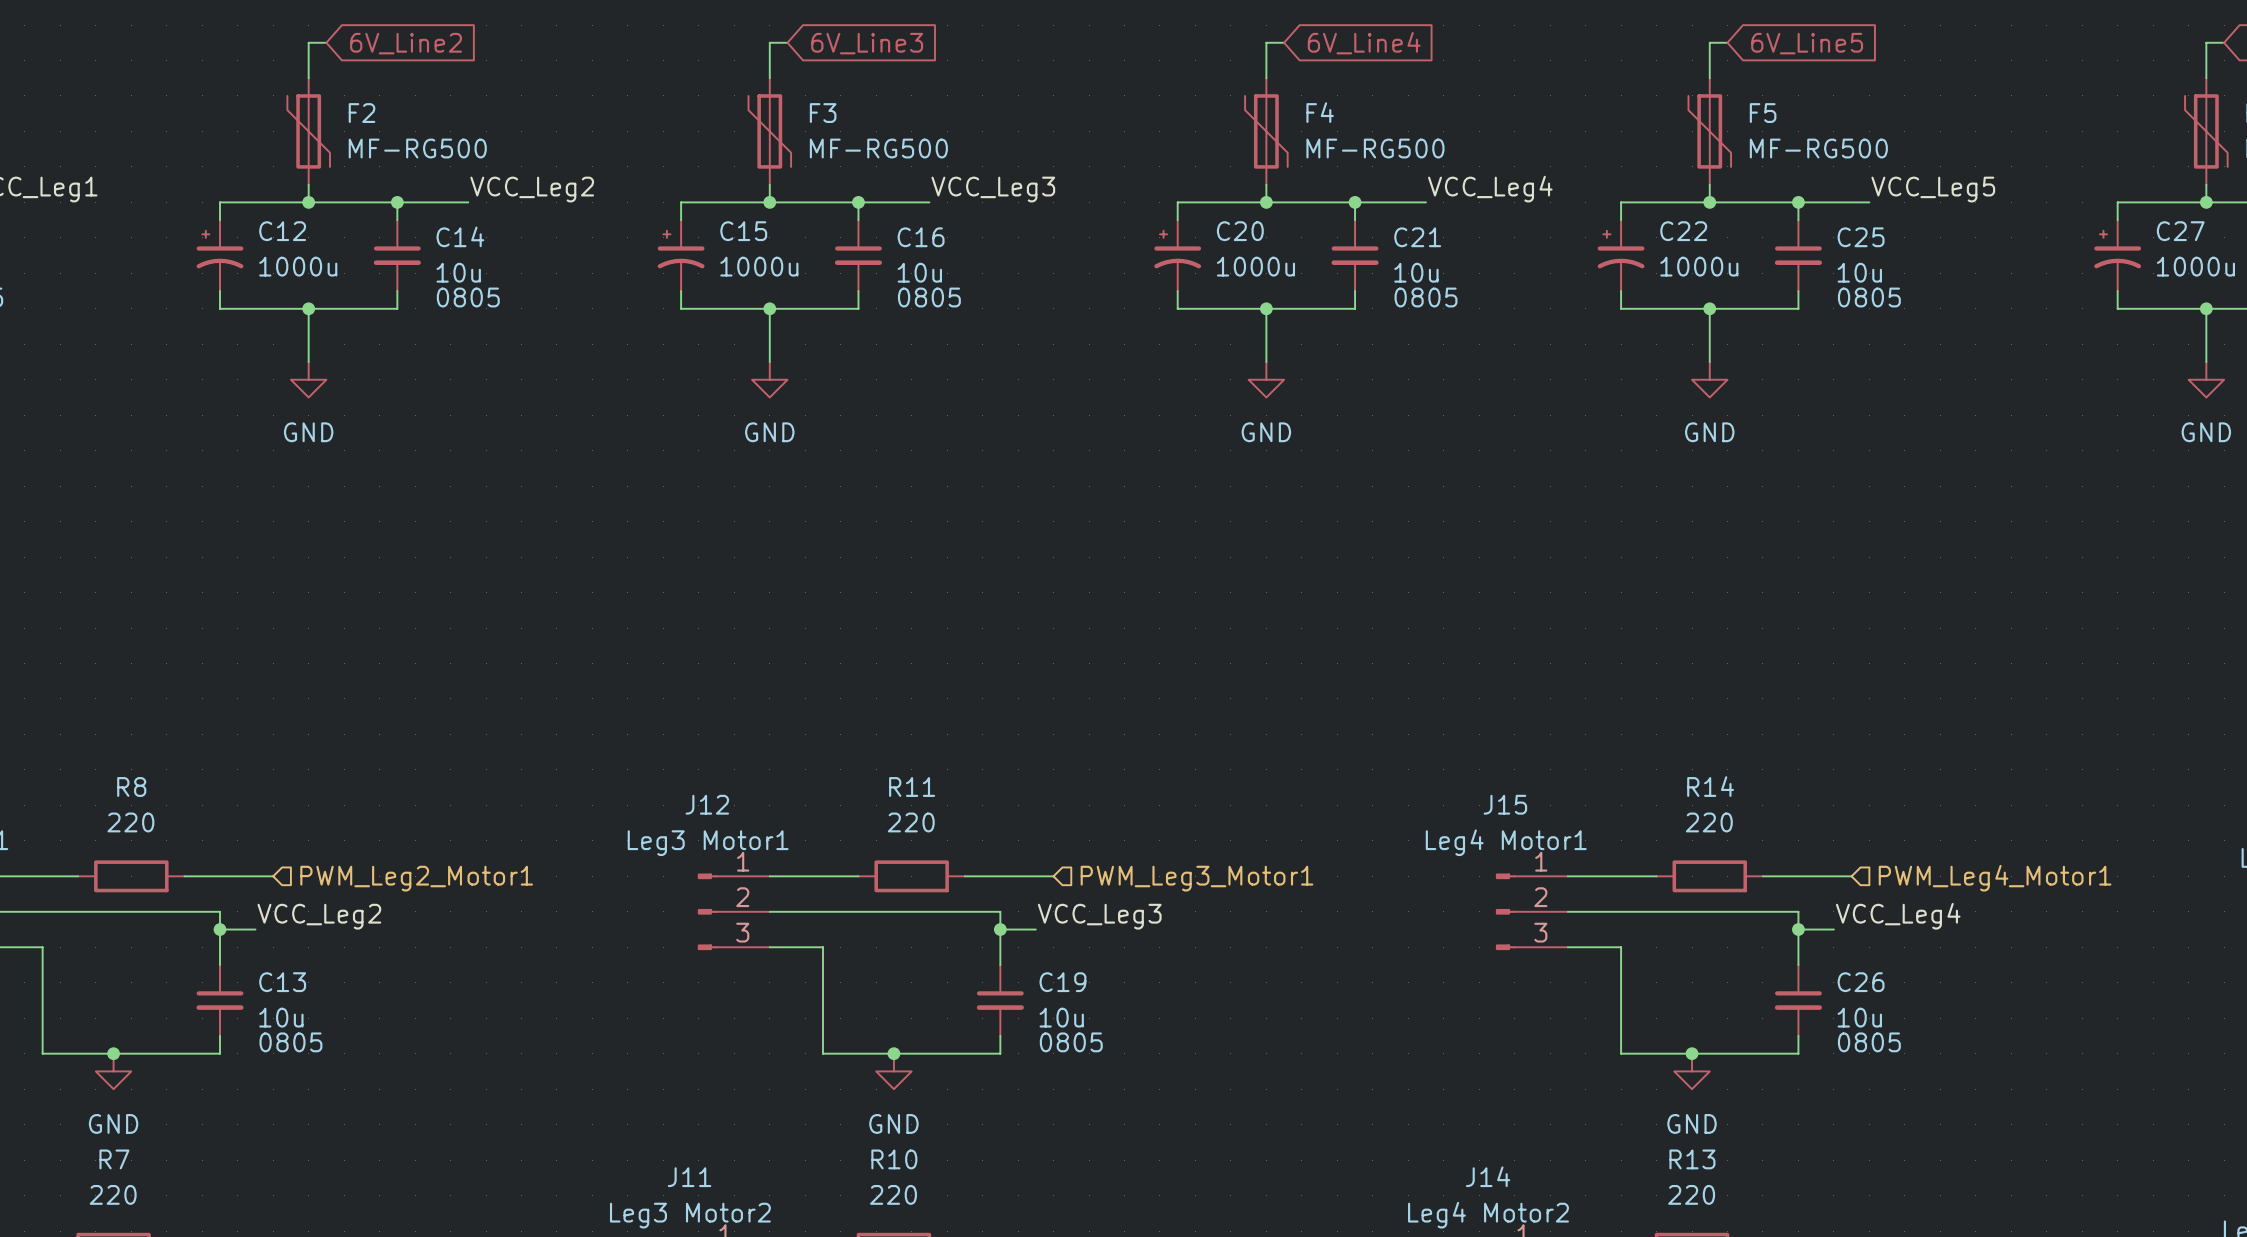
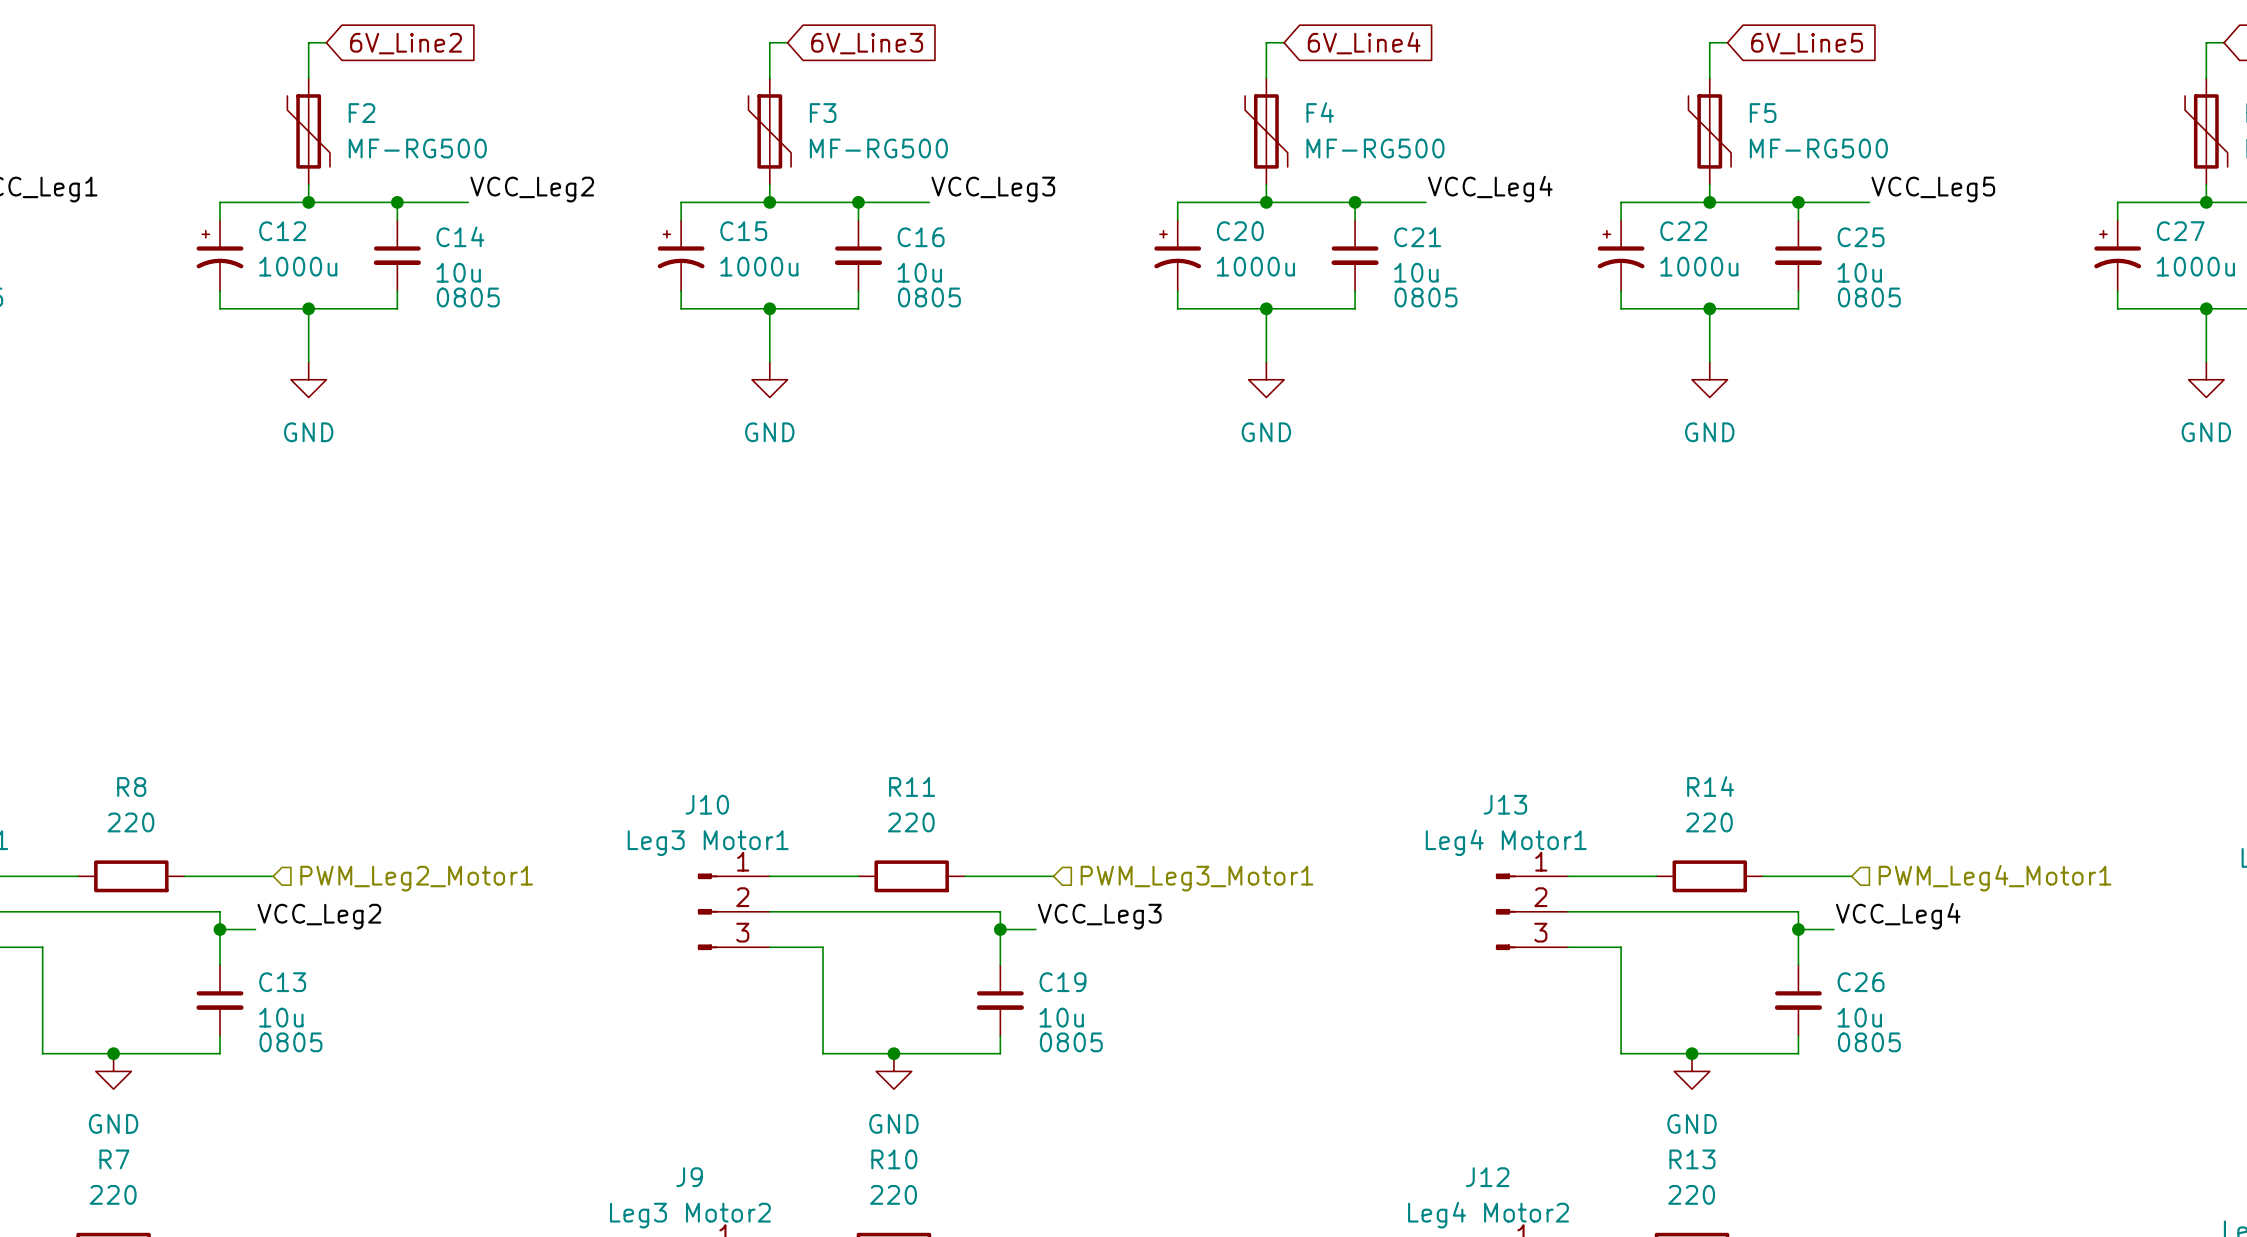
J12 name: J12 (707, 804) -> J10 (707, 804)
J15 name: J15 (1505, 804) -> J13 (1505, 804)
J14 name: J14 (1488, 1176) -> J12 (1487, 1177)
J11 name: J11 (689, 1177) -> J9 (689, 1177)

